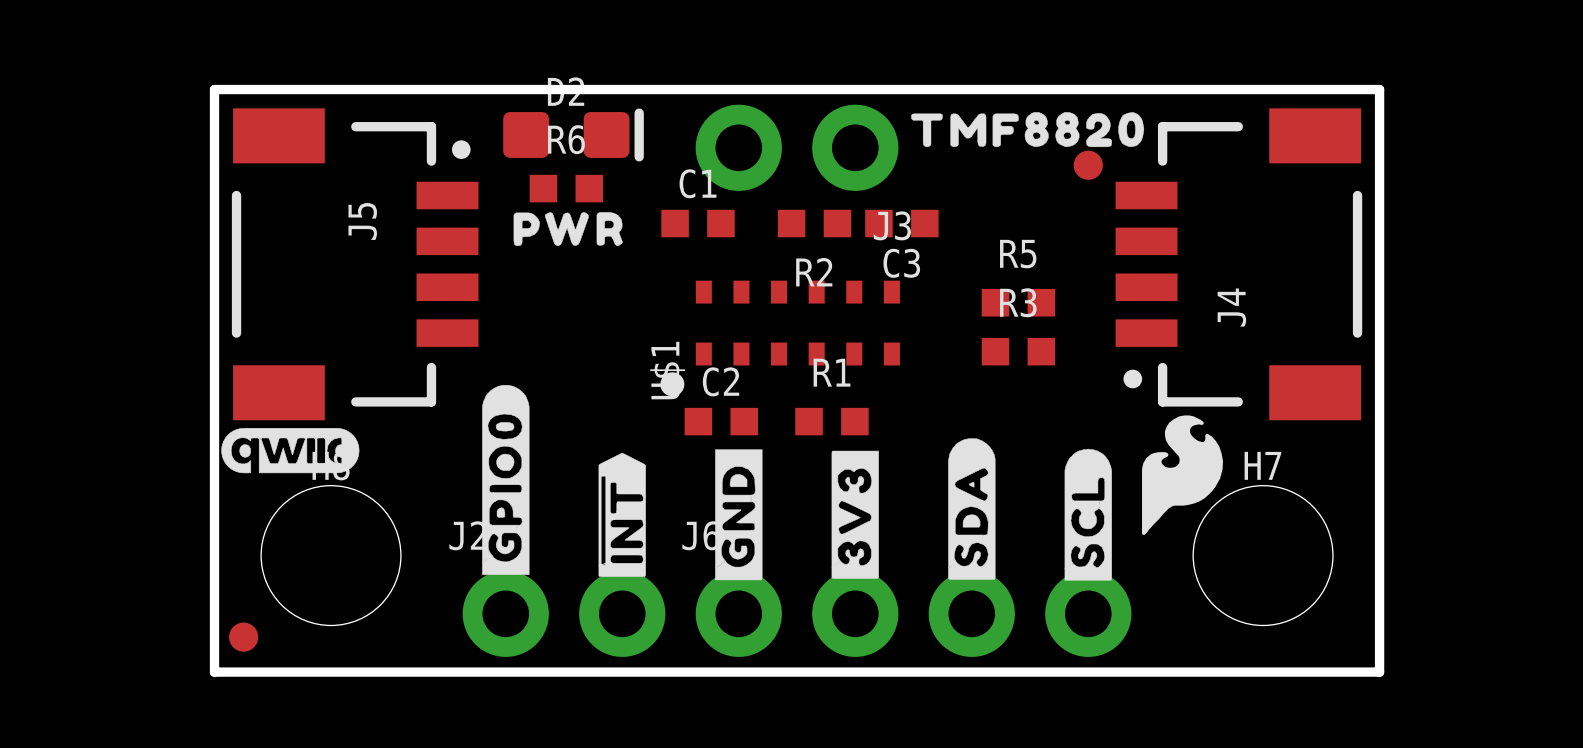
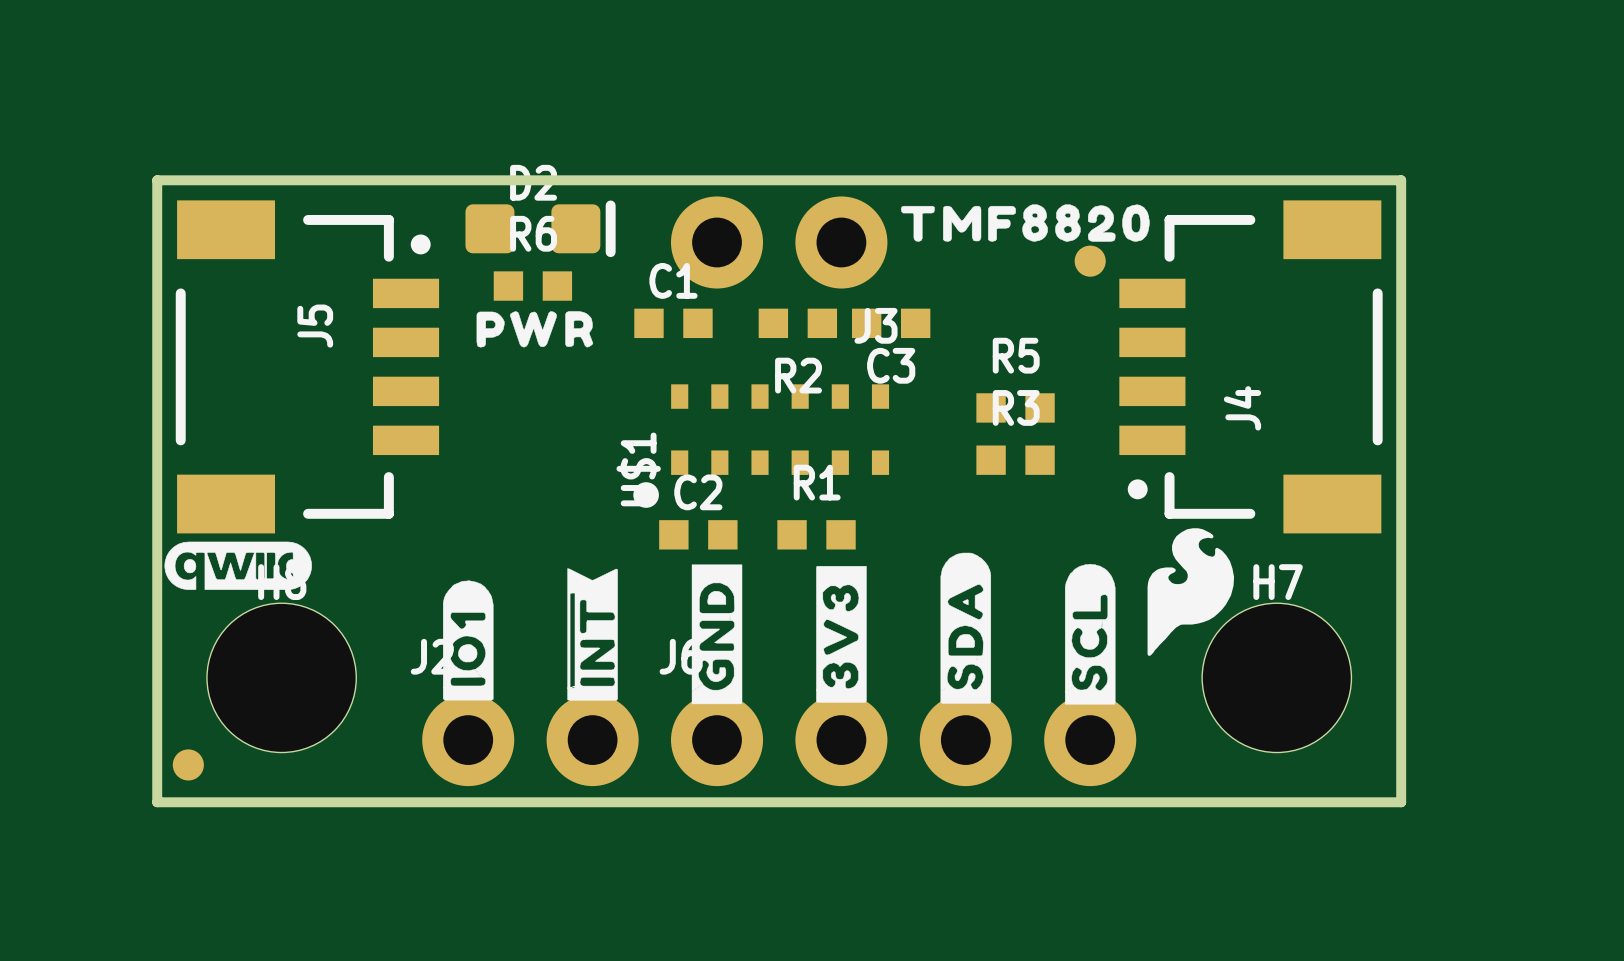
drawing shape: [482, 384, 530, 575] -> [443, 580, 494, 701]
drawing shape: [598, 452, 646, 577] -> [567, 568, 618, 701]

